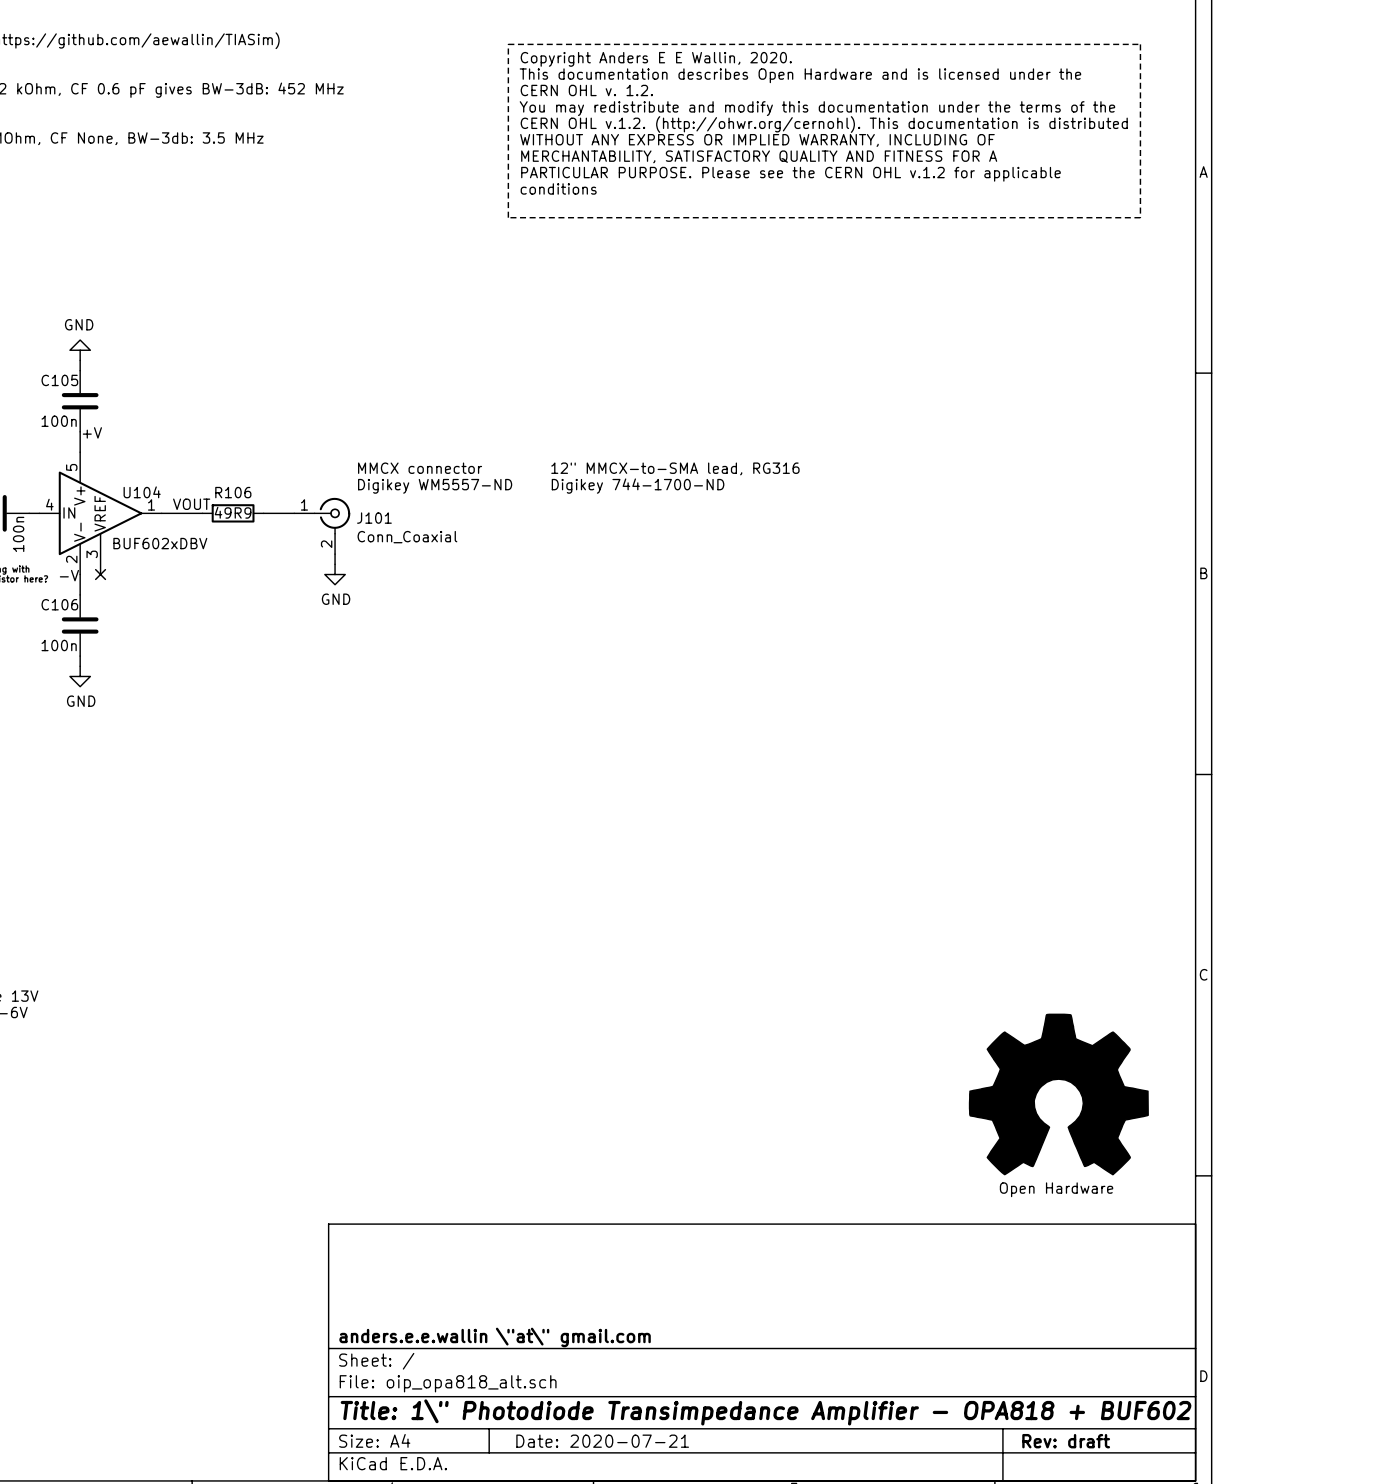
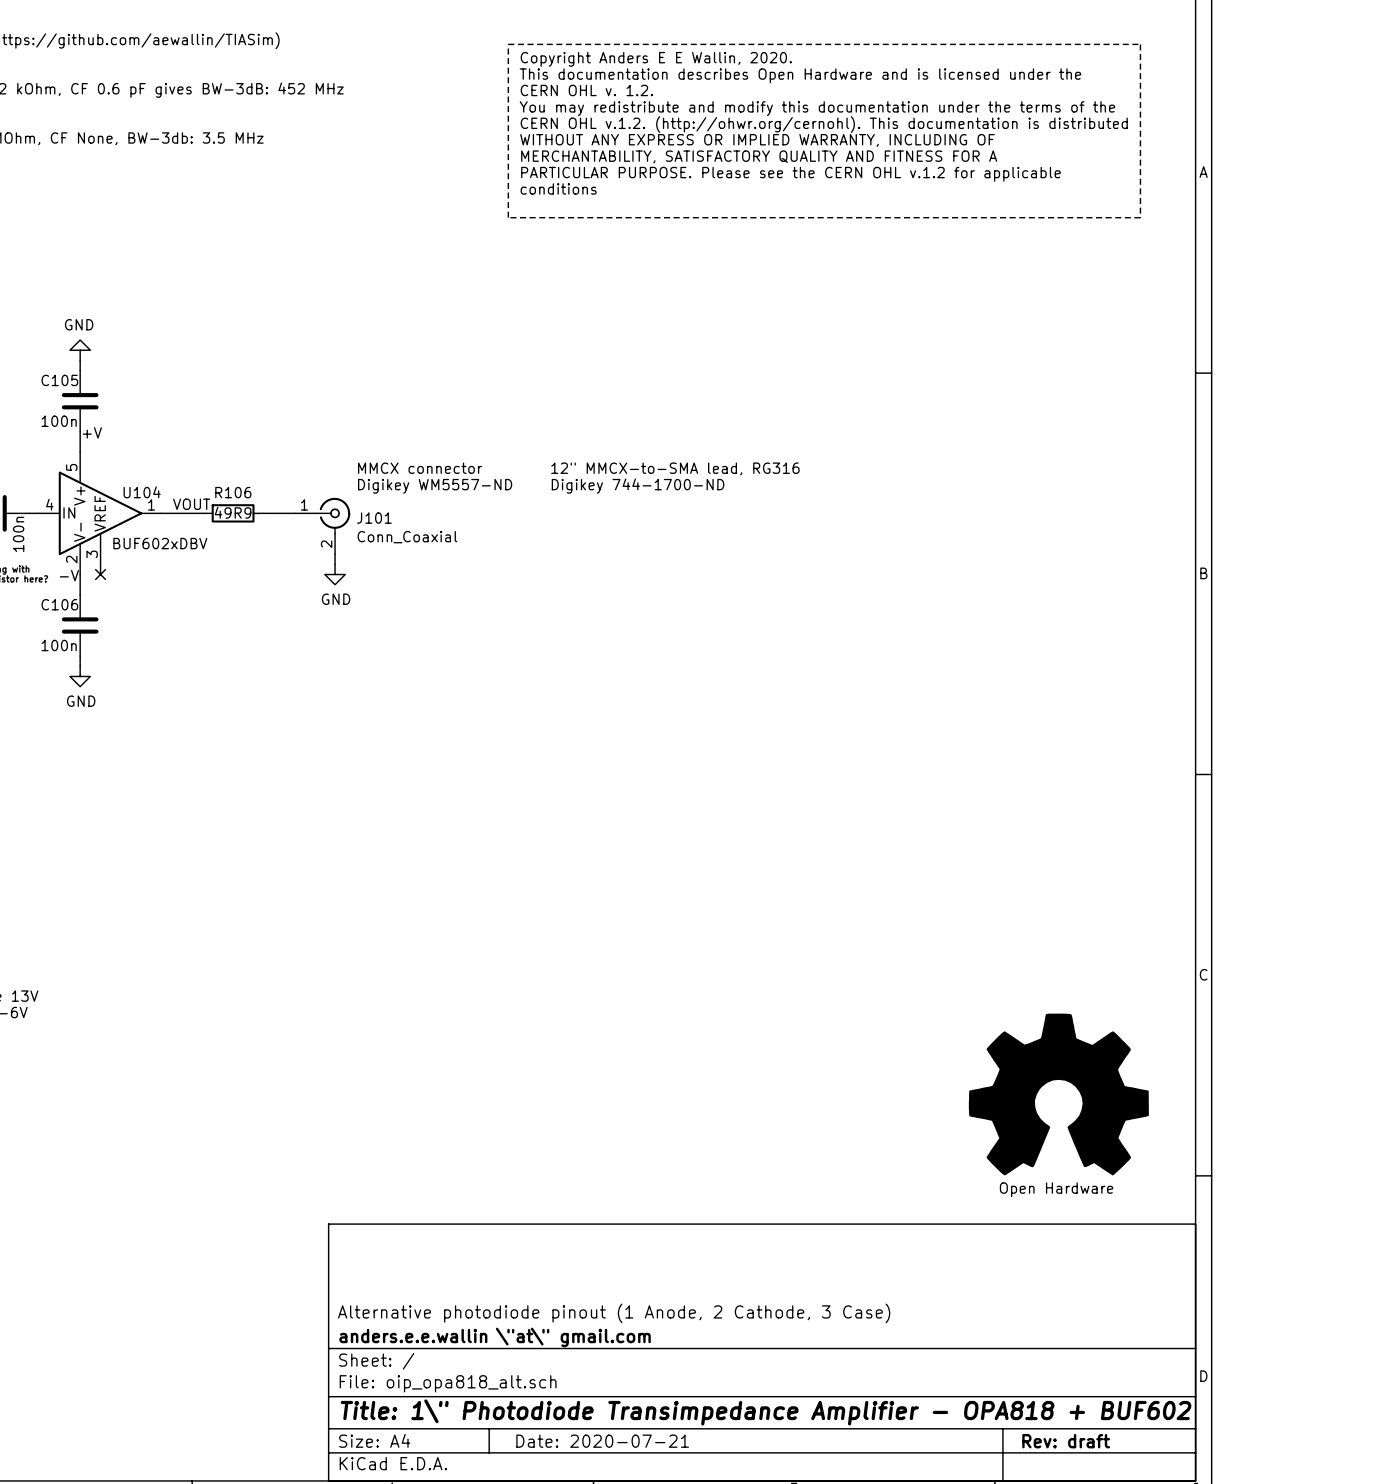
title block: none -> Alternative photodiode pinout (1 Anode, 2 Cathode, 3 Case) (614, 1313)

